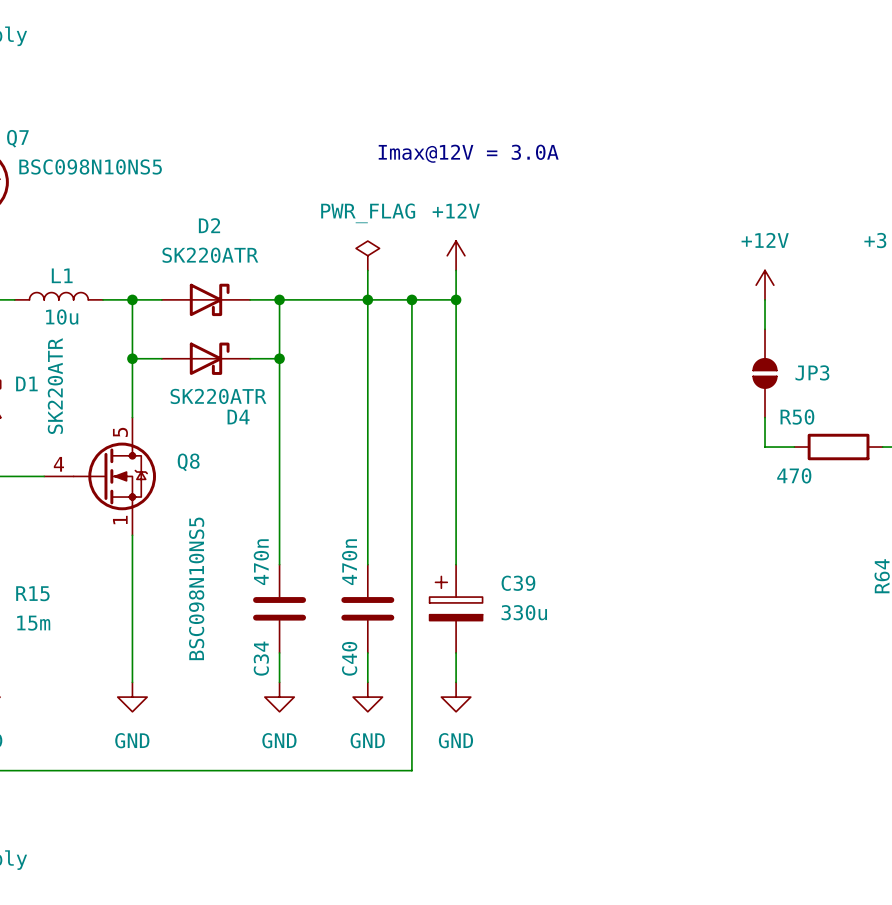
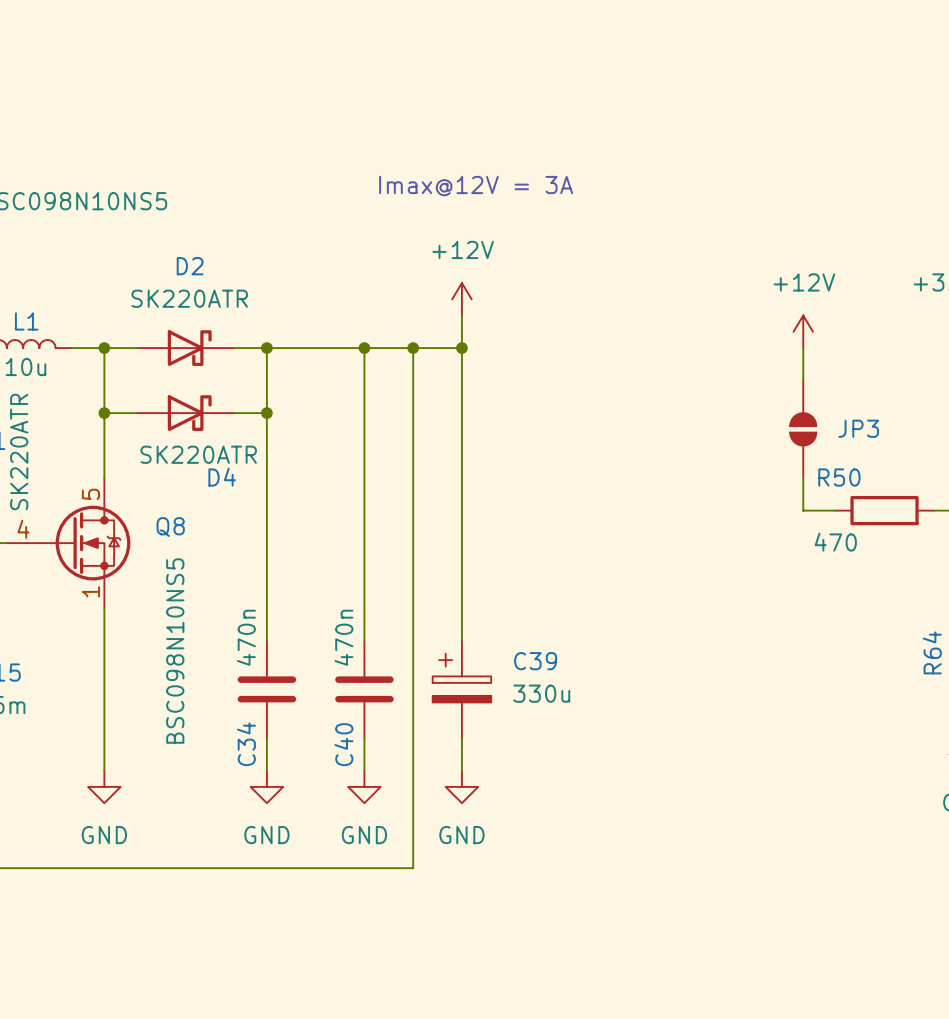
text: Imax@12V = 3.0A (468, 153) -> Imax@12V = 3A (476, 186)
power symbol: PWR_FLAG (367, 255) -> none
wire: (367, 270) (367, 299) -> none

